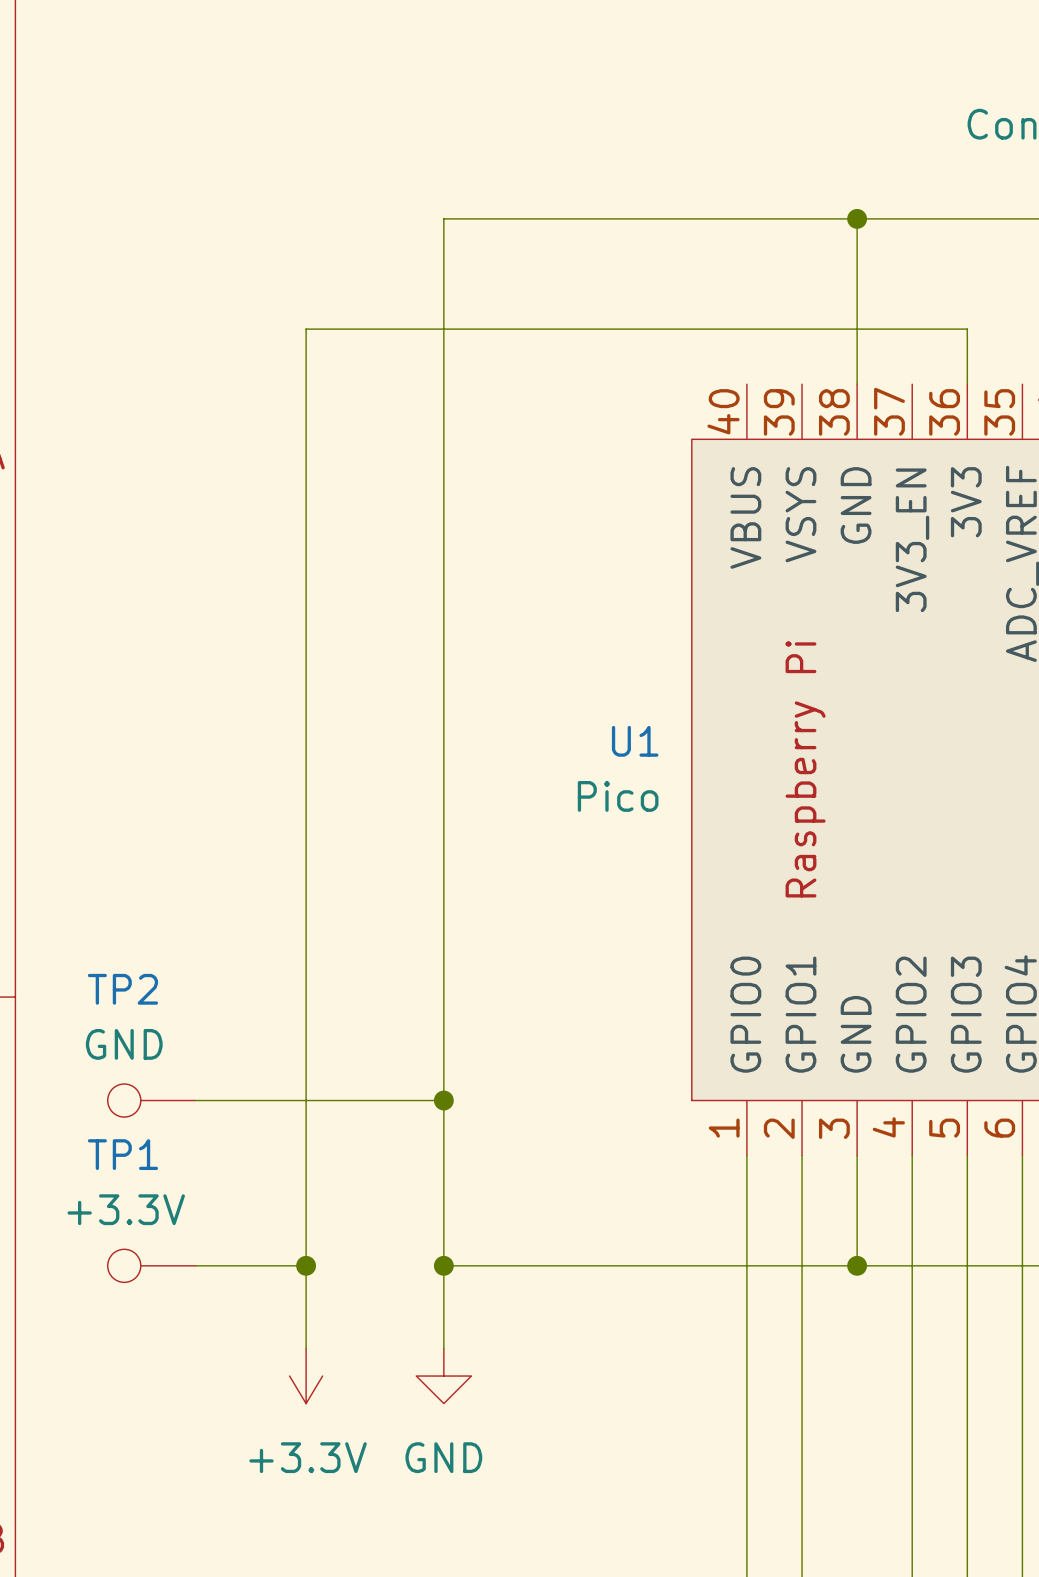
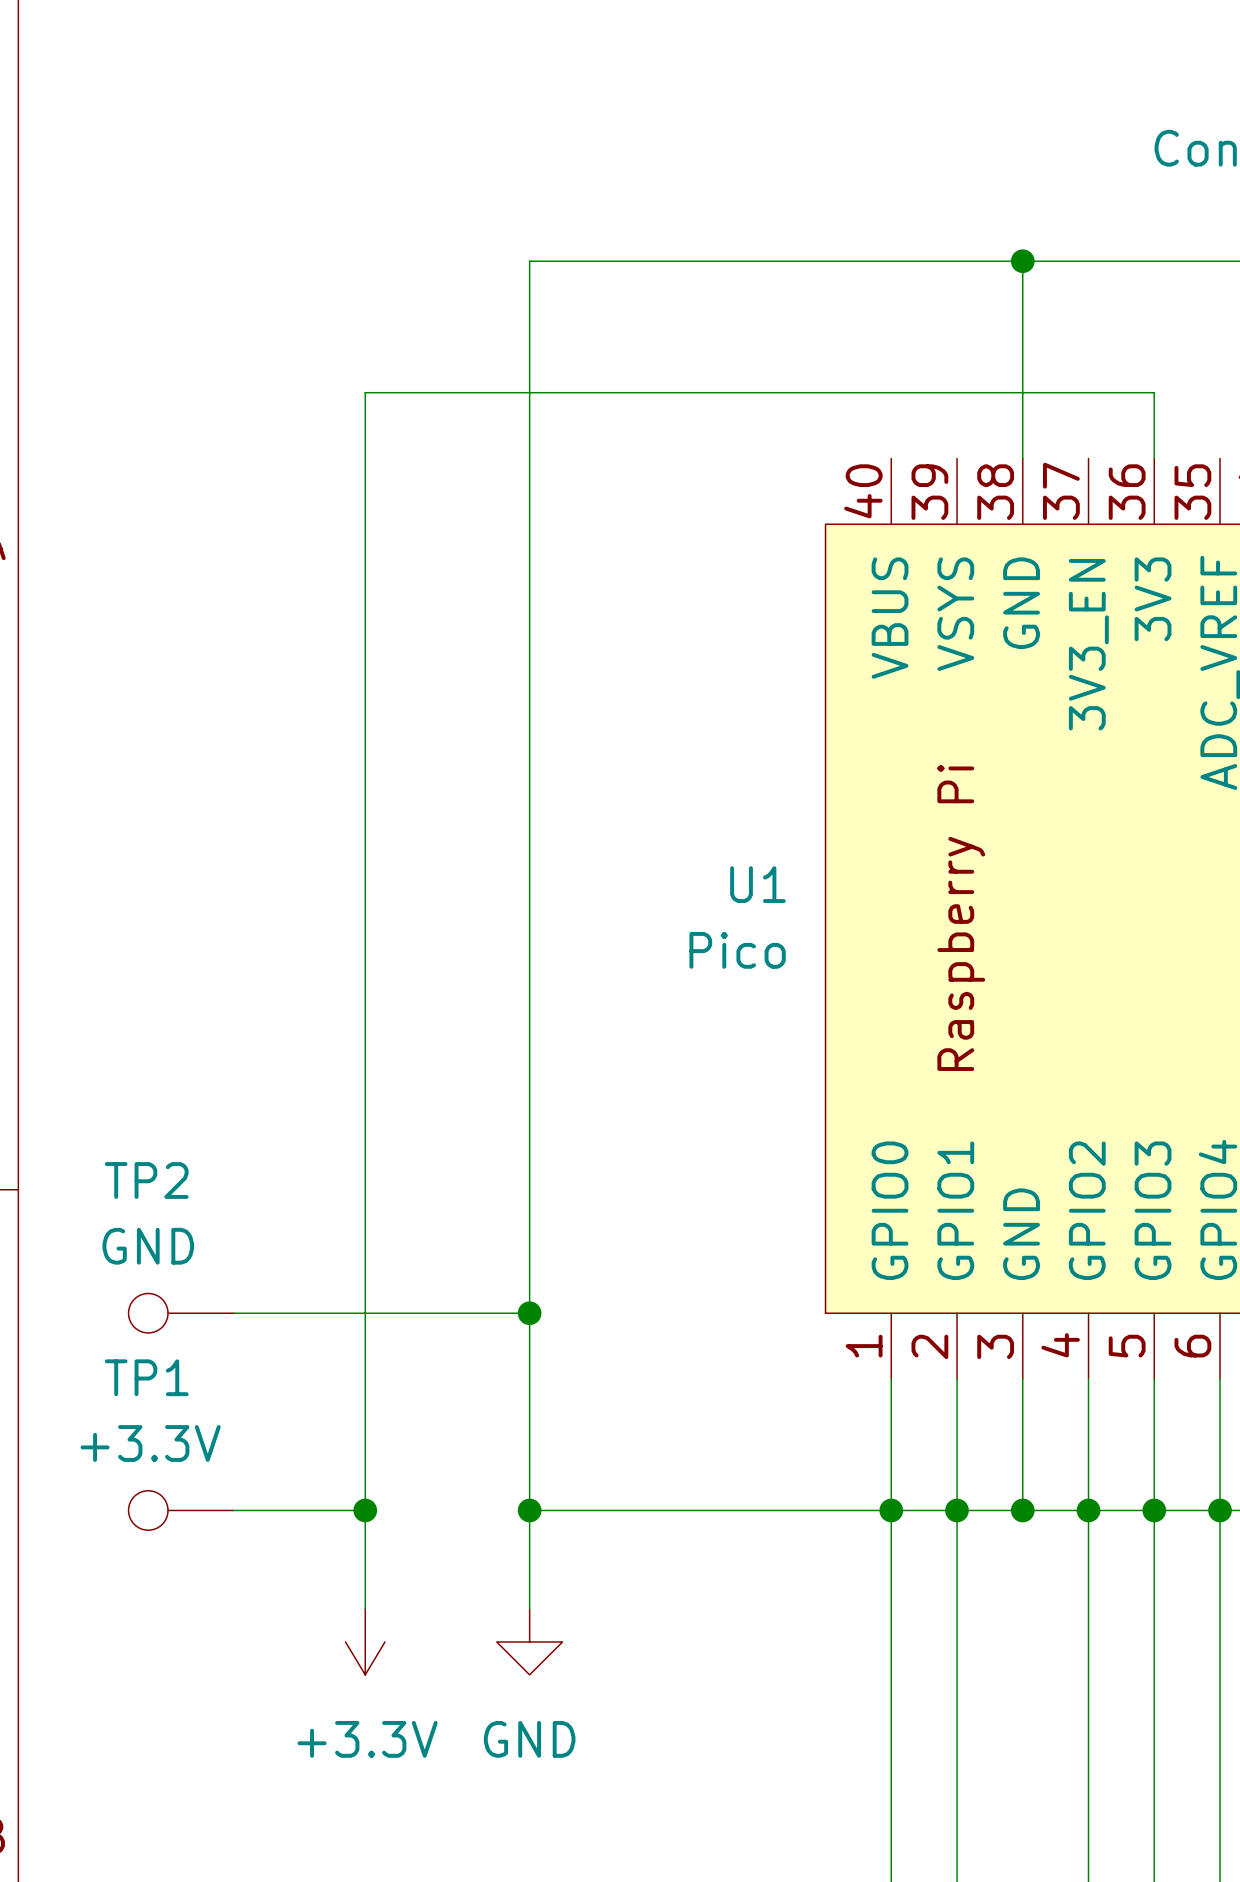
junction: none -> (891, 1510)
junction: none -> (957, 1510)
junction: none -> (1088, 1510)
junction: none -> (1154, 1510)
junction: none -> (1220, 1510)

